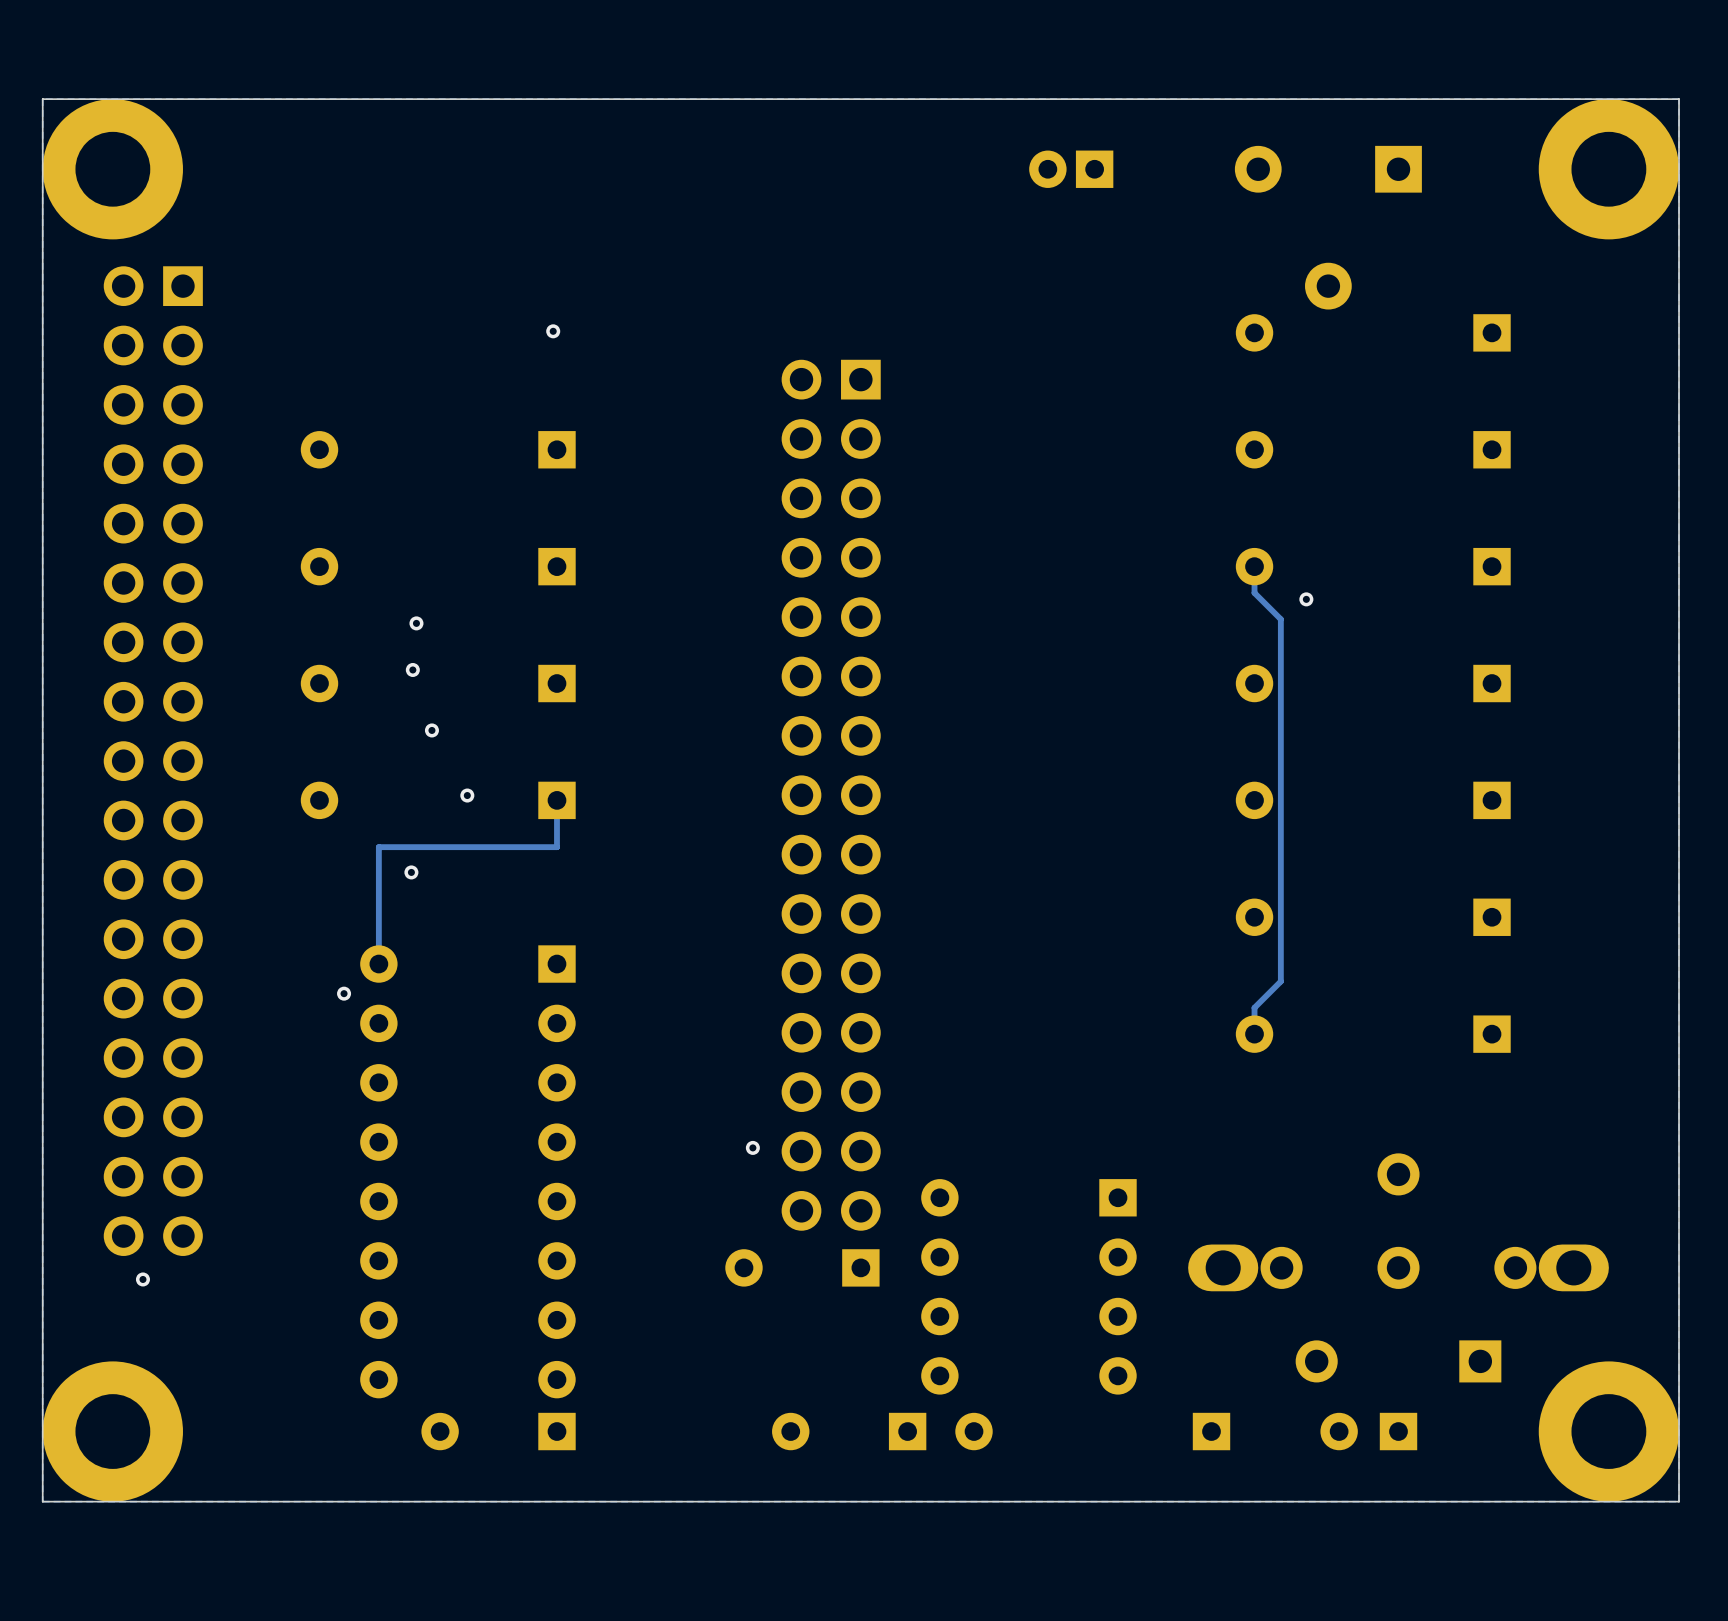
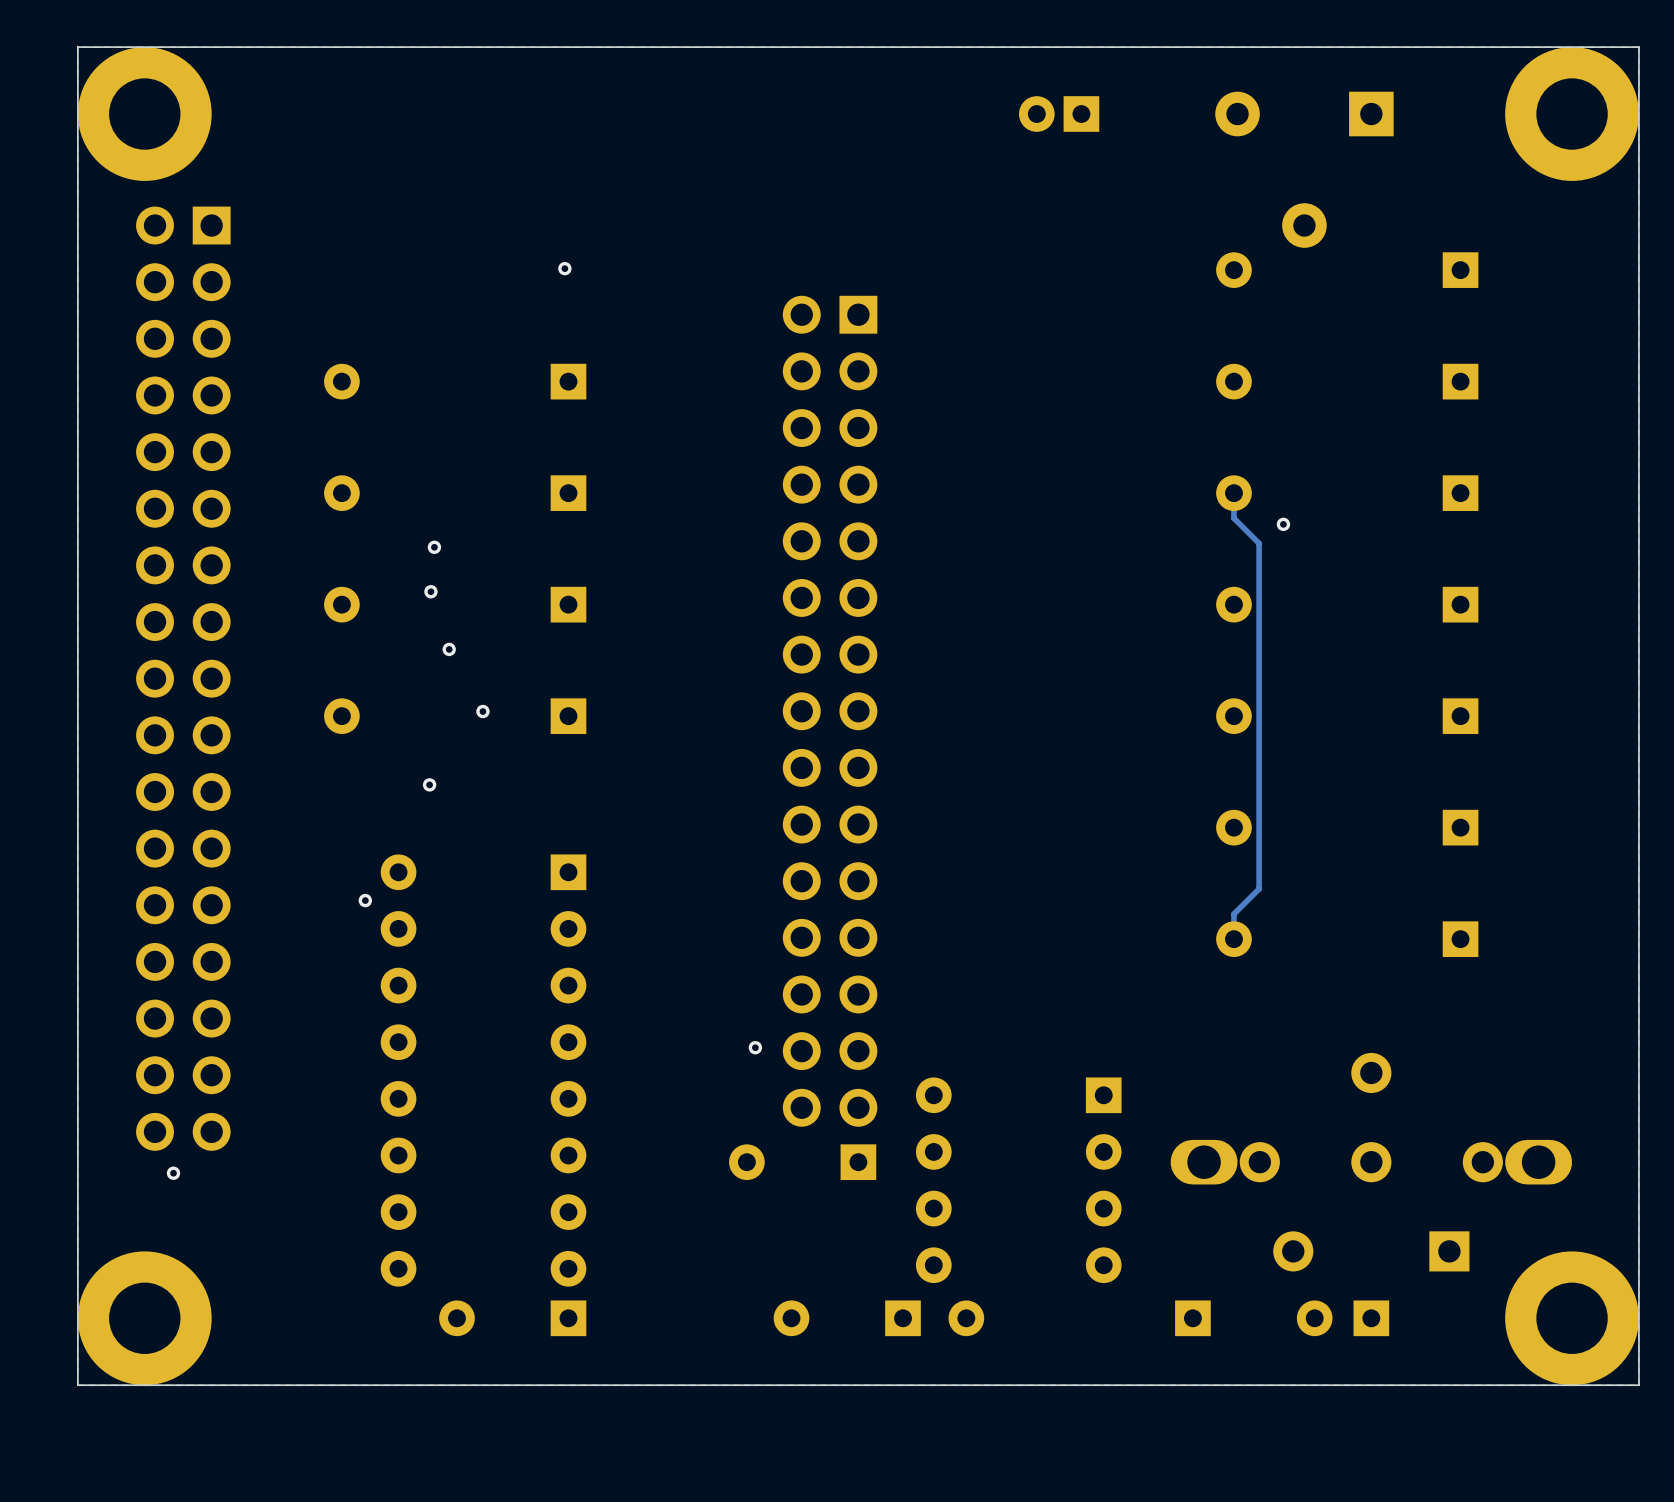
track: (556, 800) (556, 847) (378, 847) (378, 964) -> none

